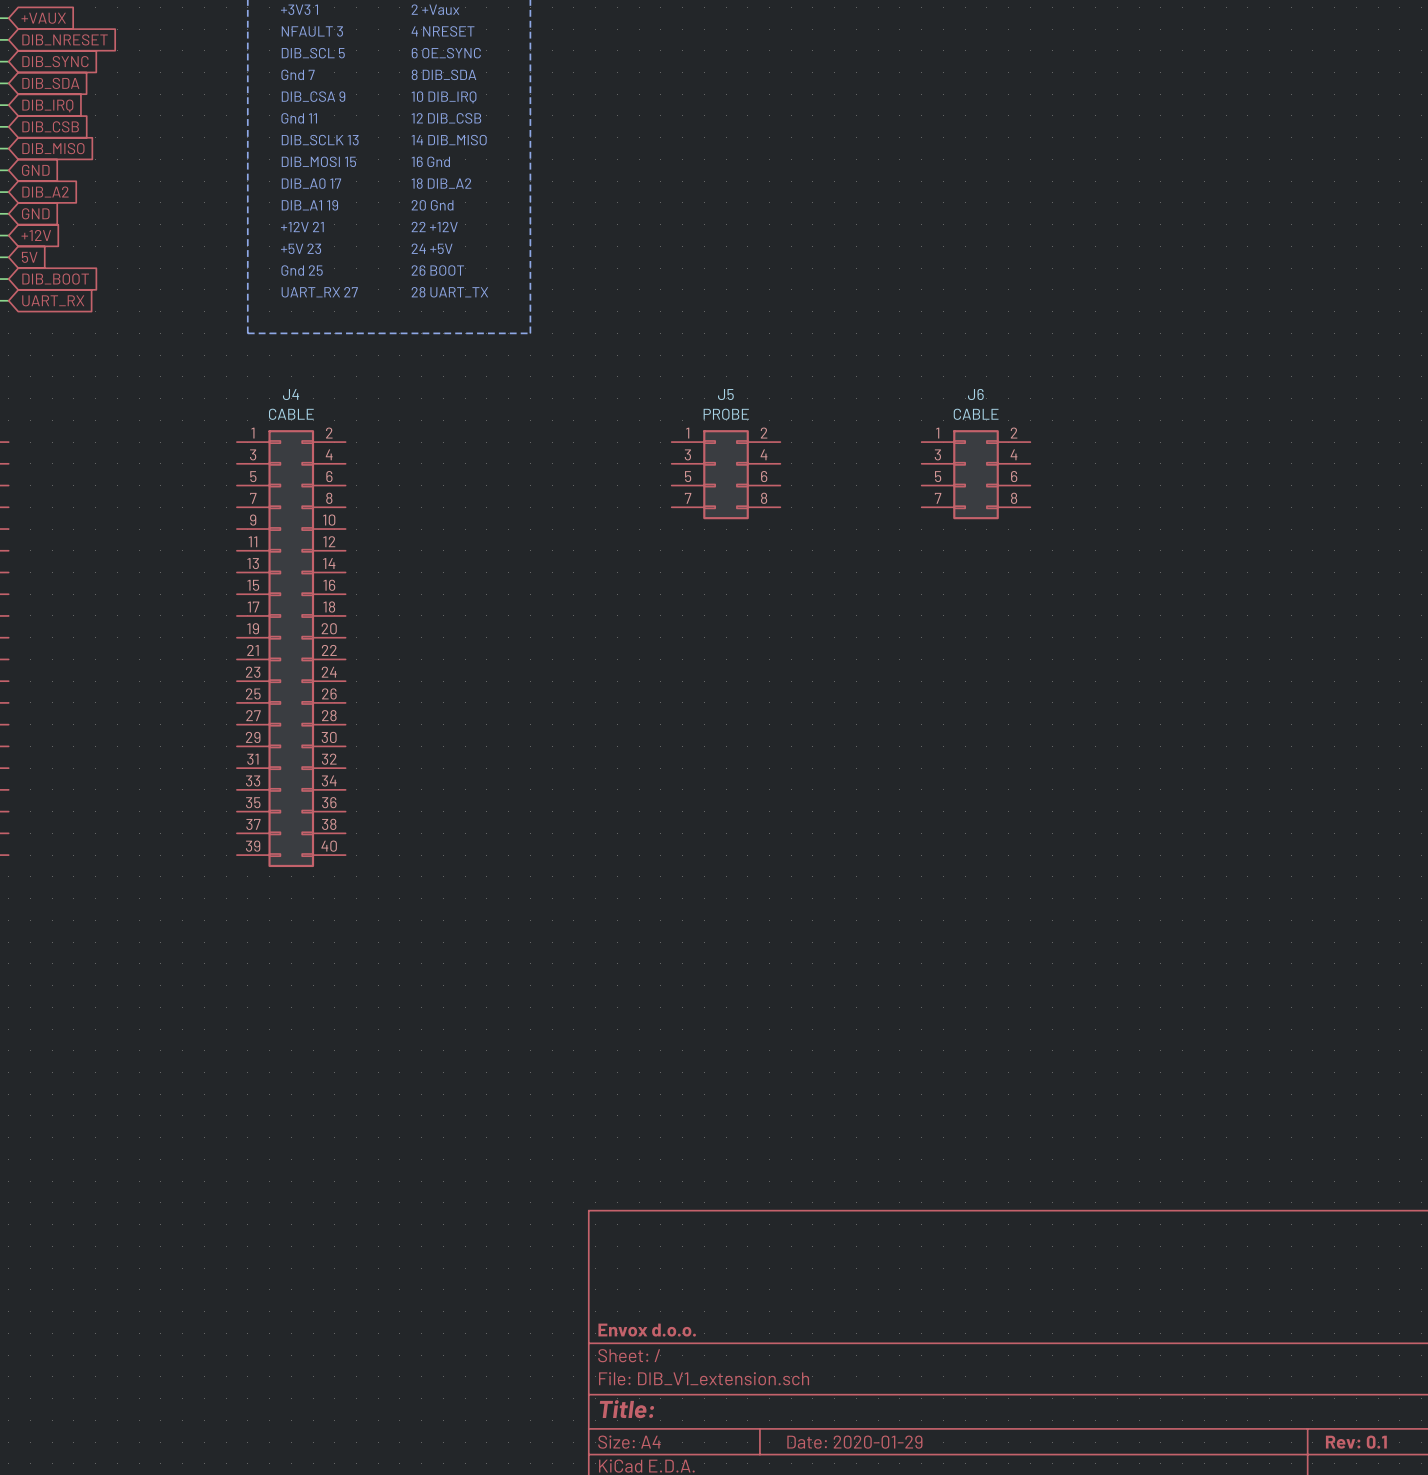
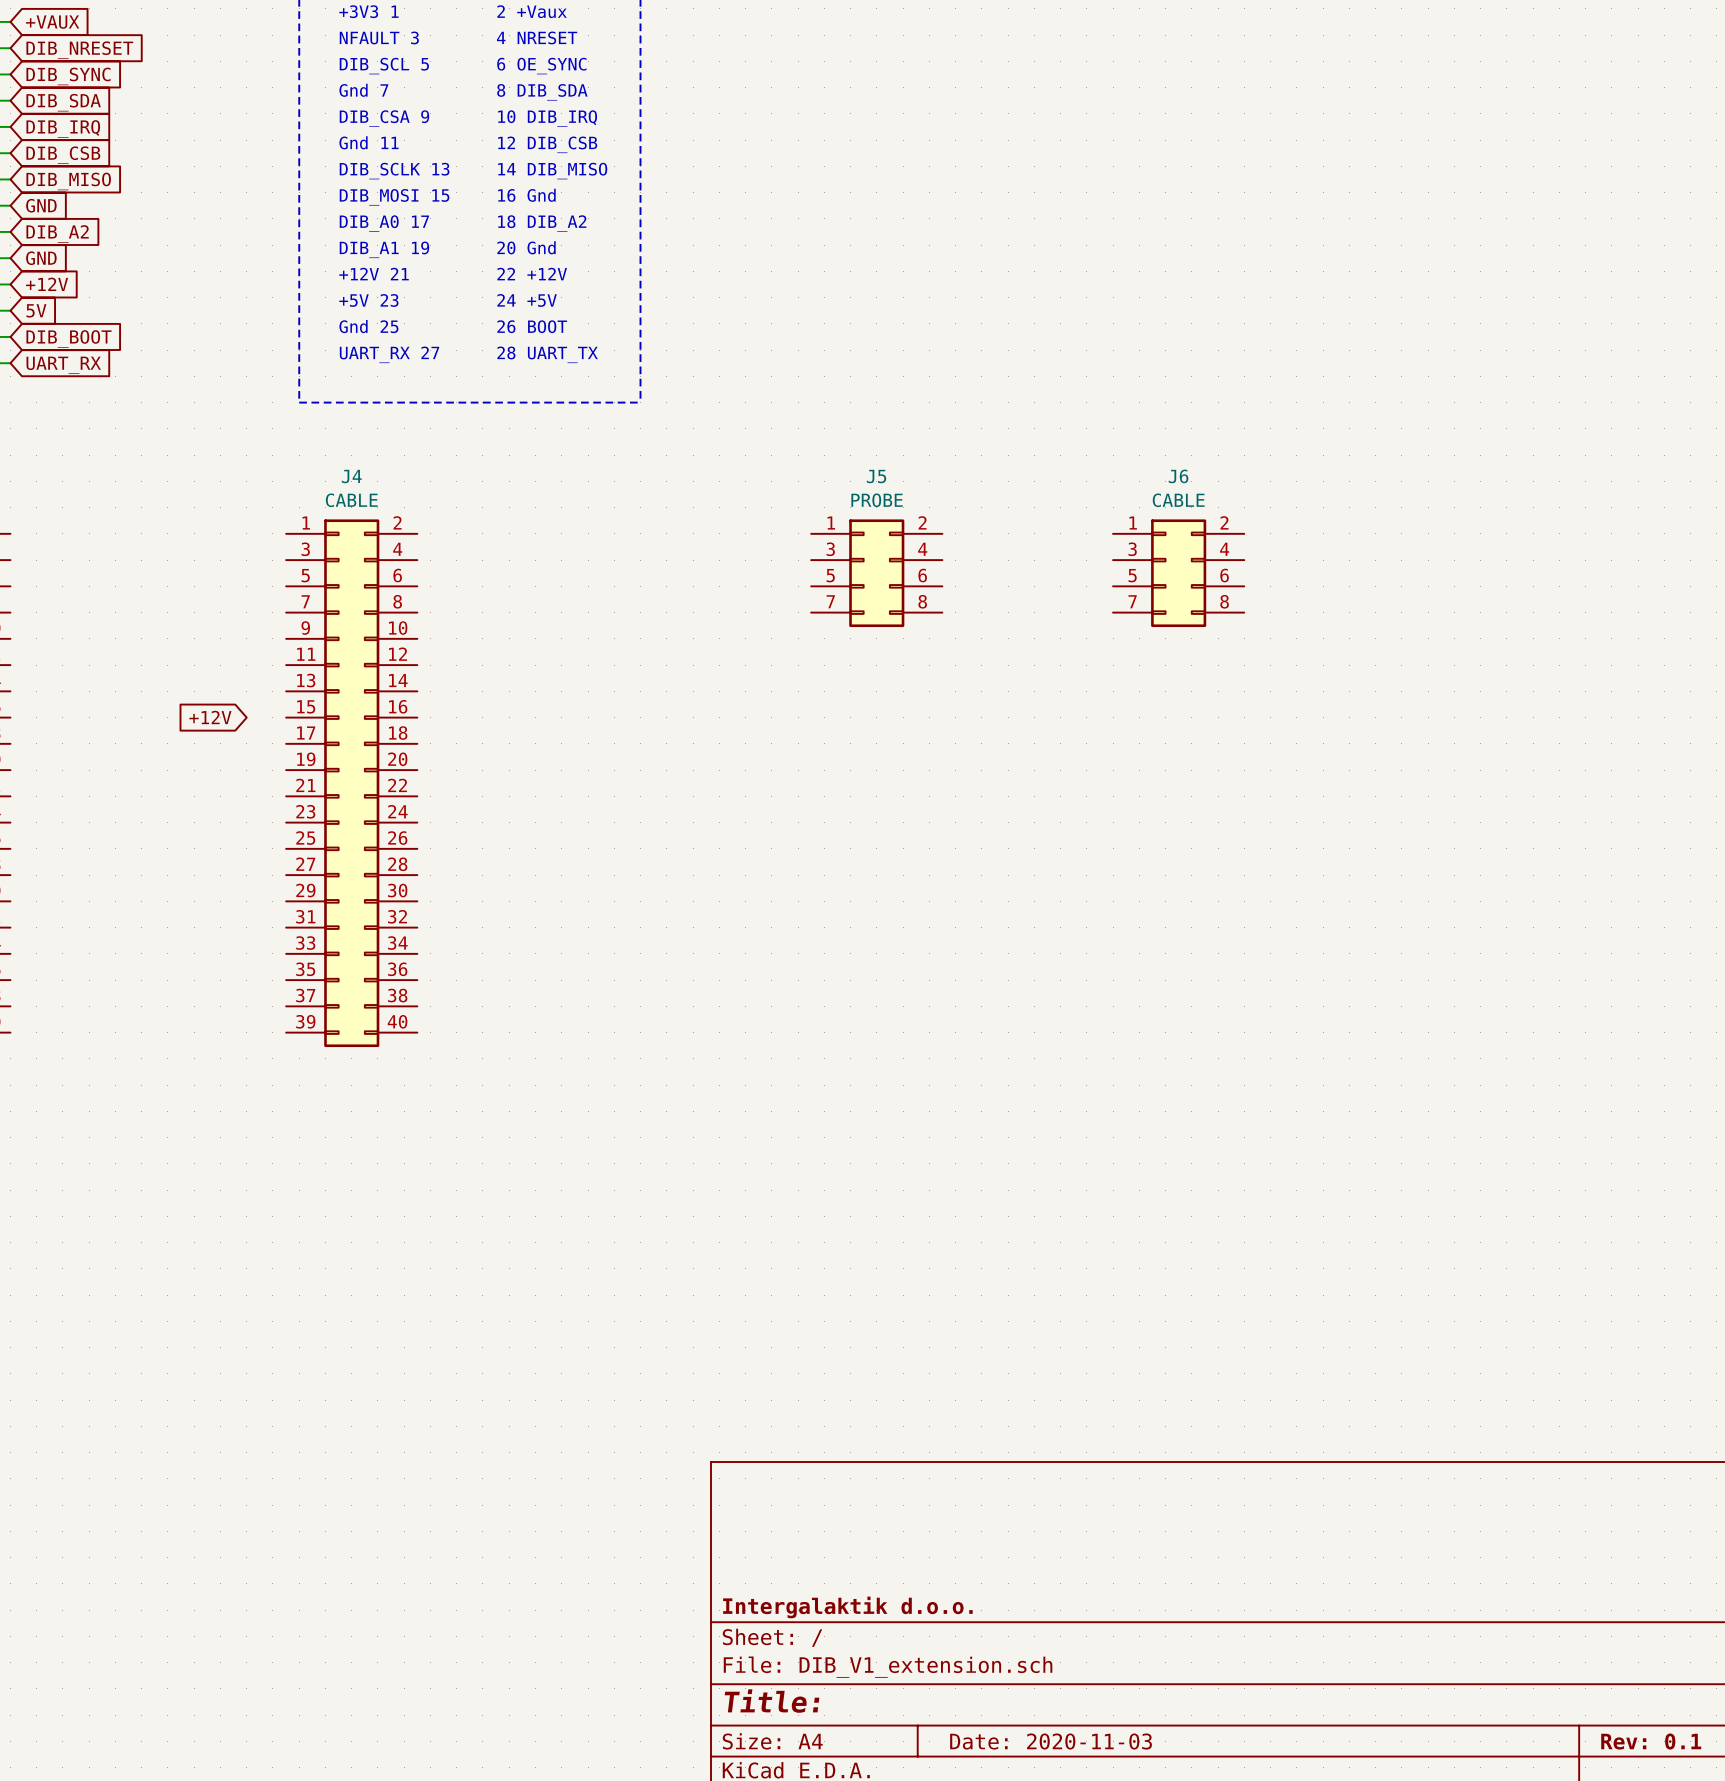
global label: none -> +12V (210, 717)
title block: Envox d.o.o. (647, 1330) -> Intergalaktik d.o.o. (847, 1607)
title block: Date: 2020-01-29 (854, 1442) -> Date: 2020-11-03 (1051, 1741)

